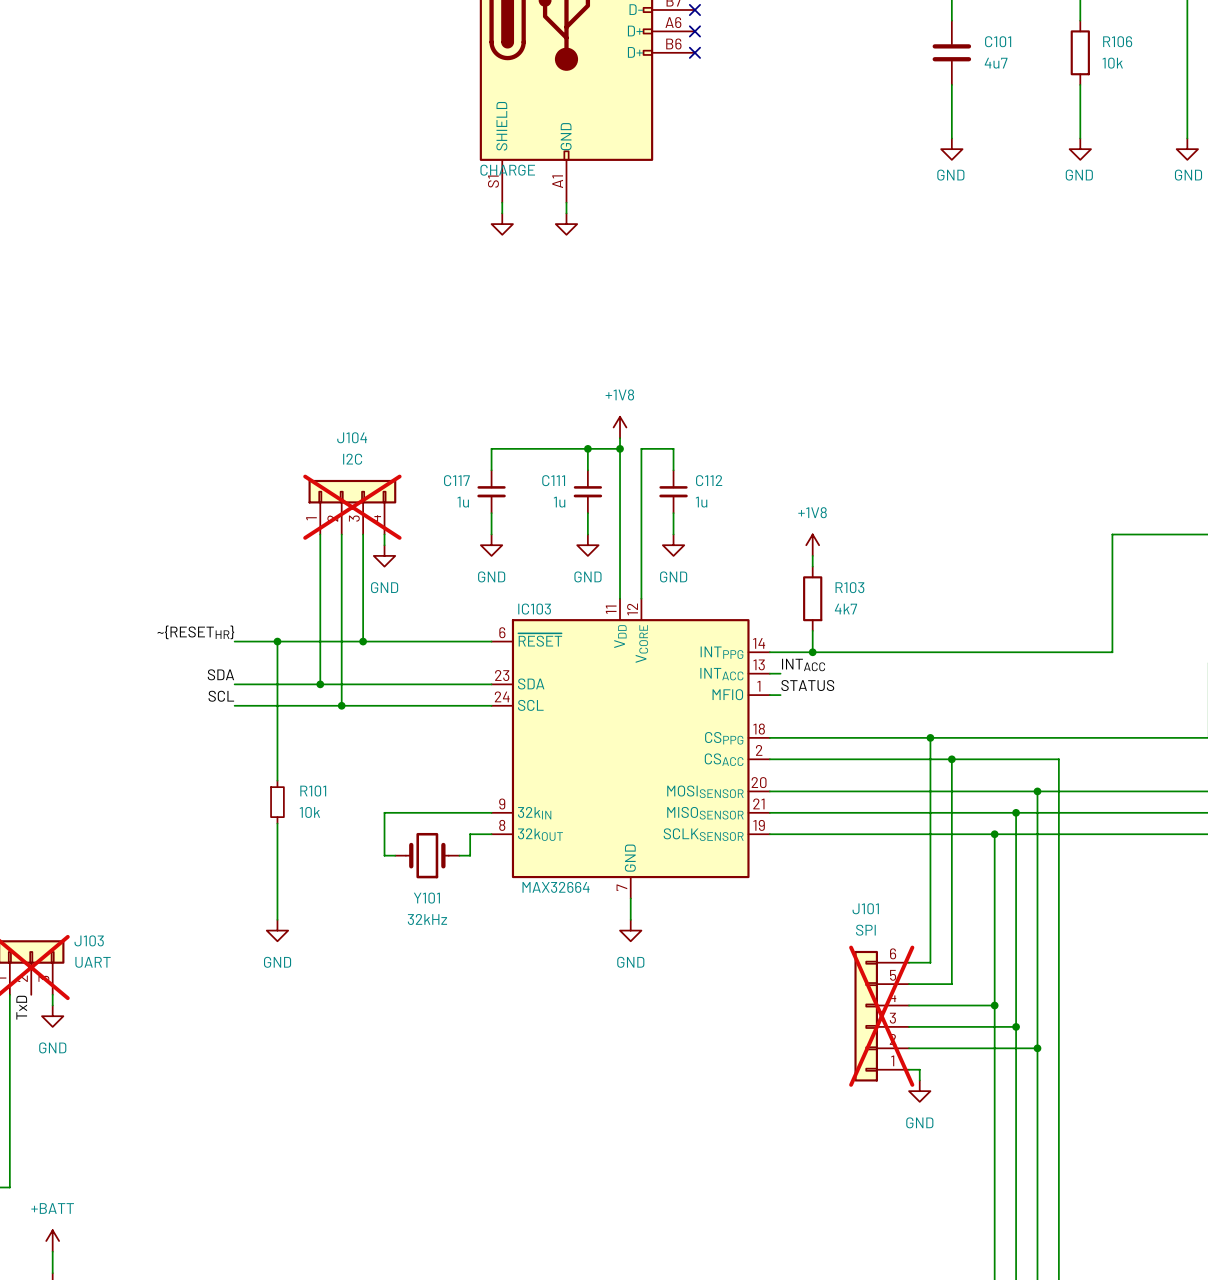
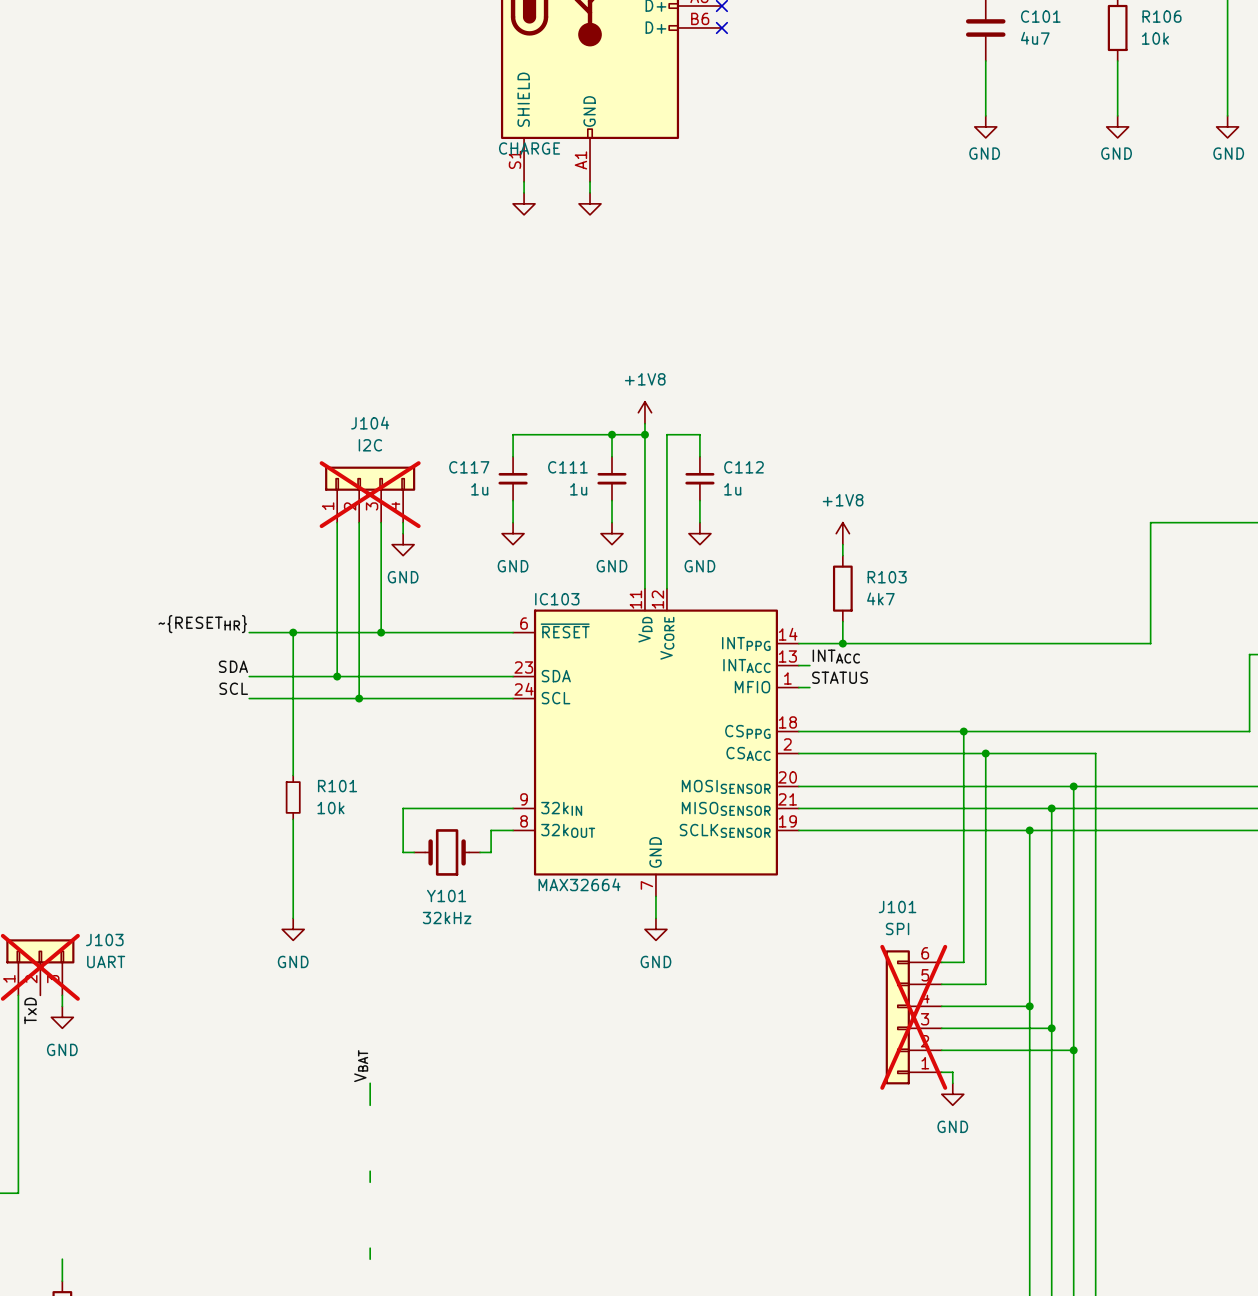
label: none -> VBAT (361, 1066)
wire: none -> (370, 1083) (370, 1105)
wire: none -> (370, 1171) (370, 1182)
power symbol: +BATT (52, 1241) -> none
wire: none -> (370, 1248) (370, 1259)

